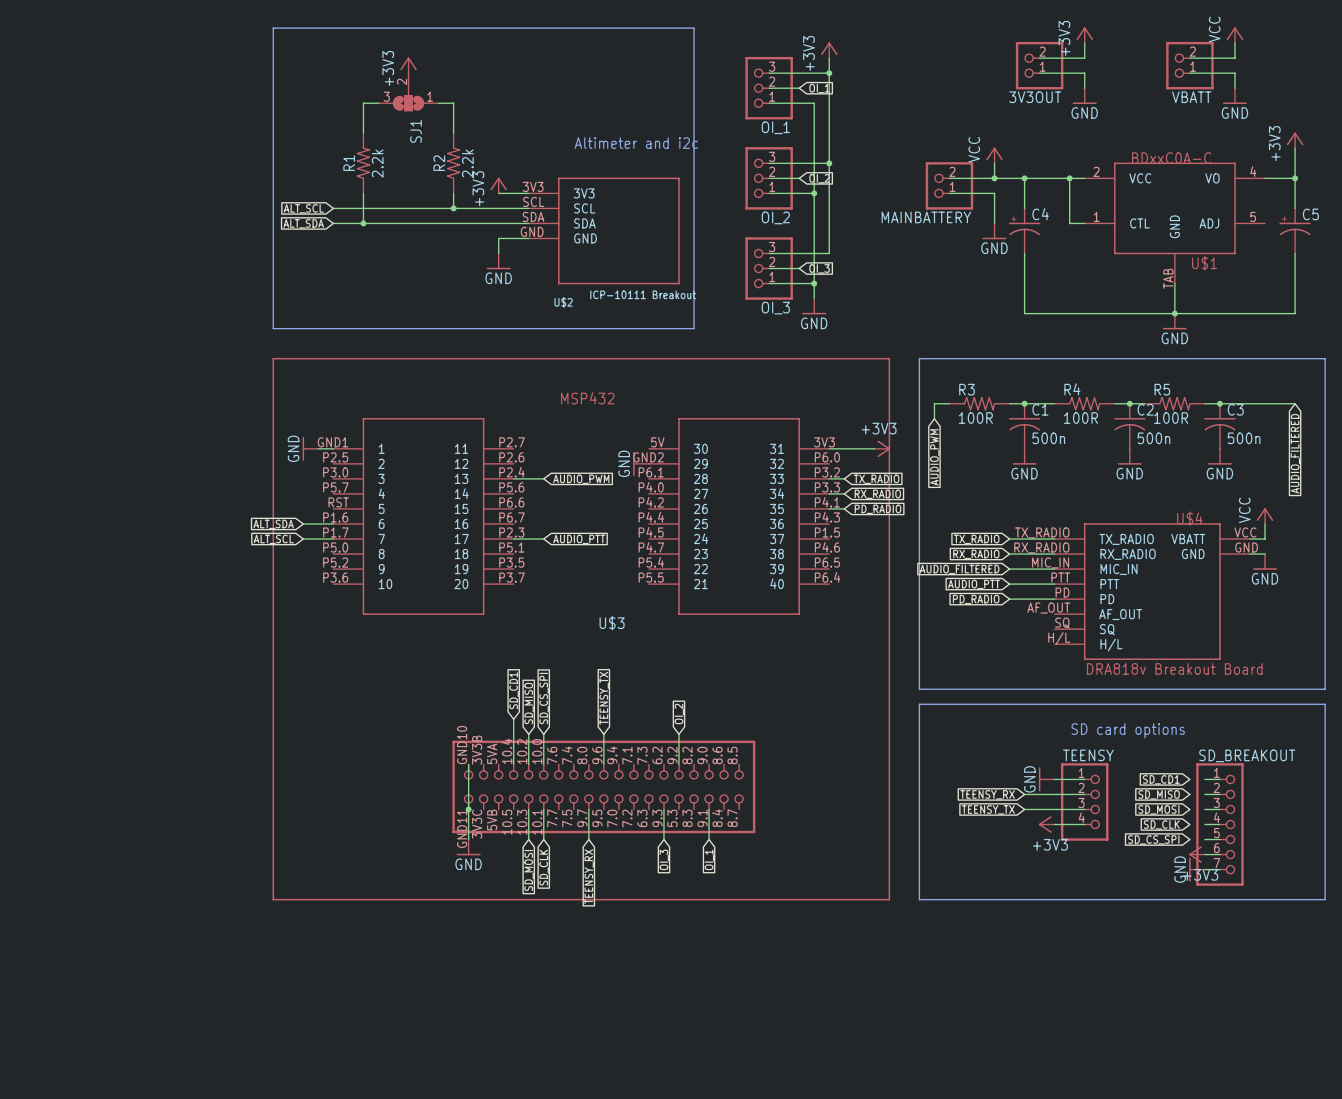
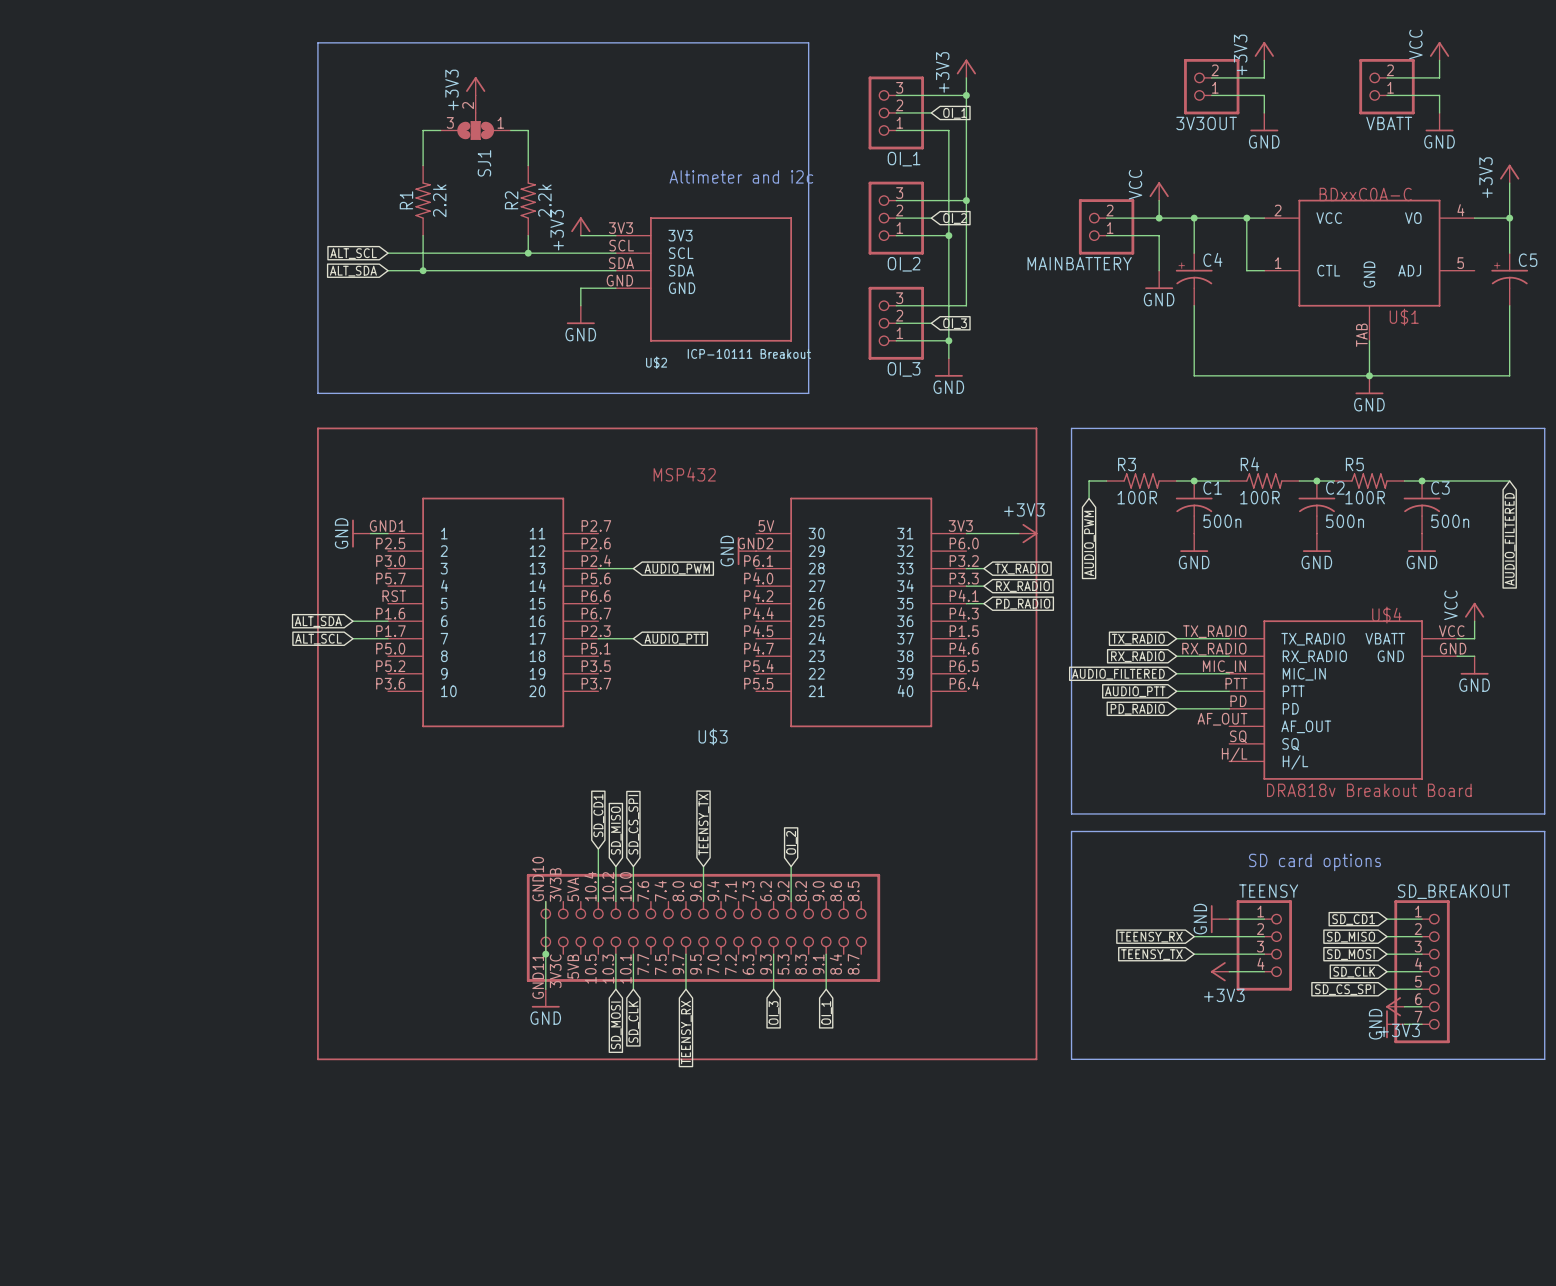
wire: none -> (1386, 919) (1404, 919)
wire: none -> (1386, 936) (1404, 936)
wire: none -> (1386, 954) (1404, 954)
wire: none -> (1386, 971) (1404, 971)
wire: none -> (1386, 989) (1404, 989)

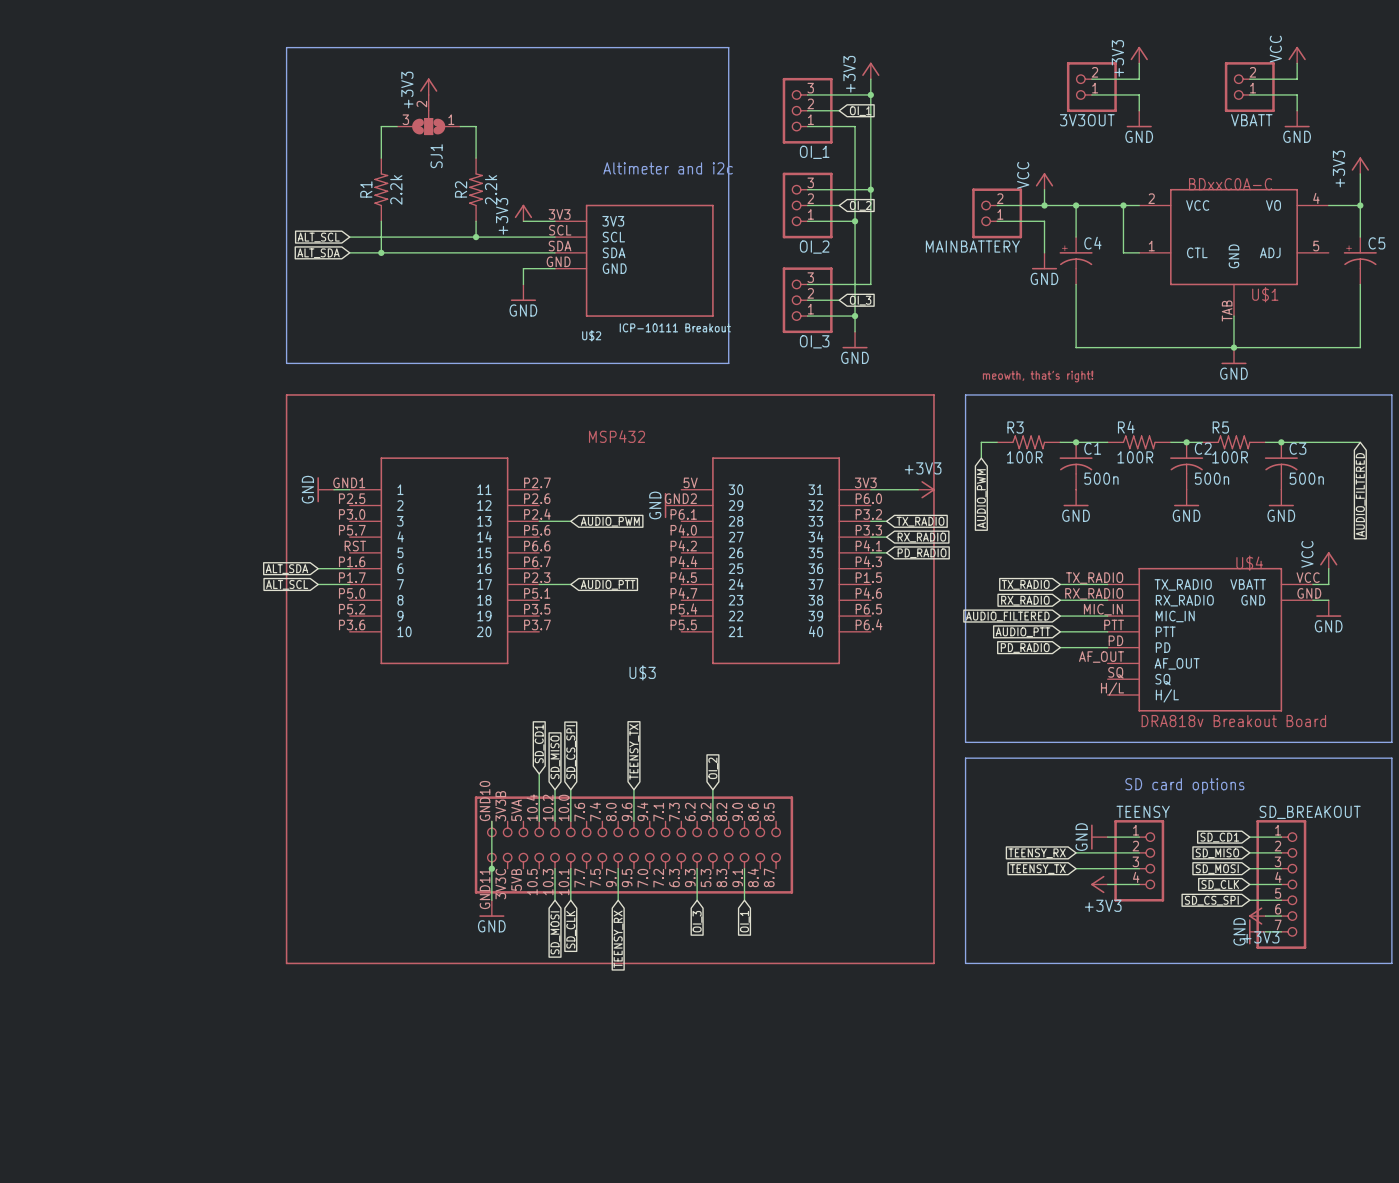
part: none -> (1038, 376)

